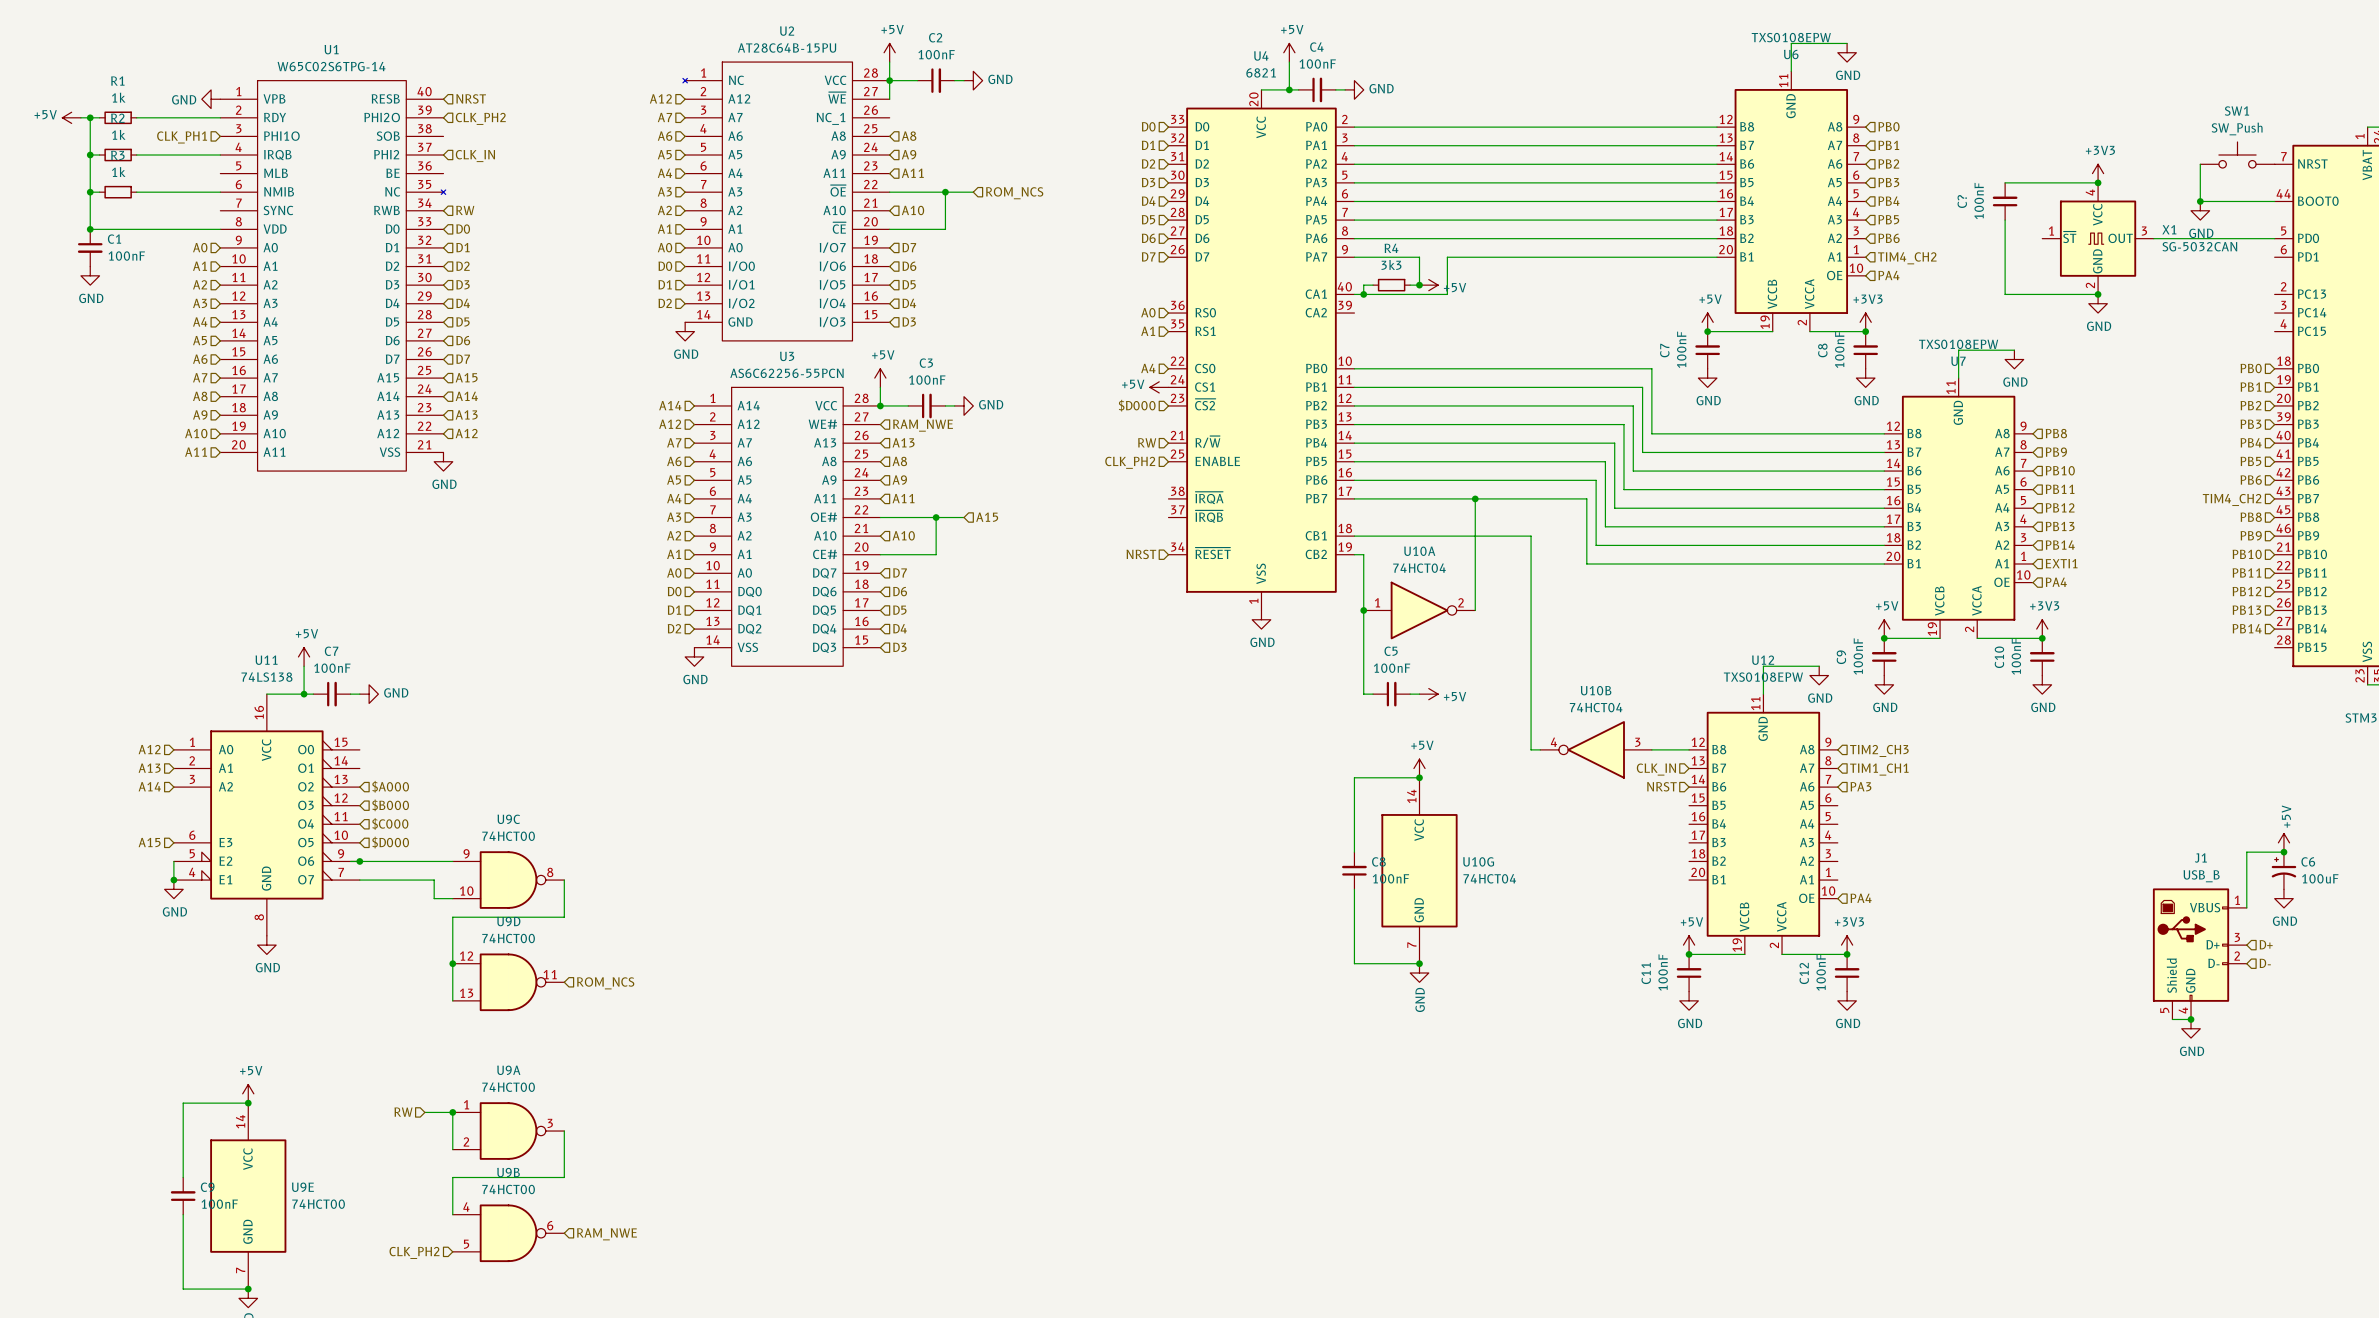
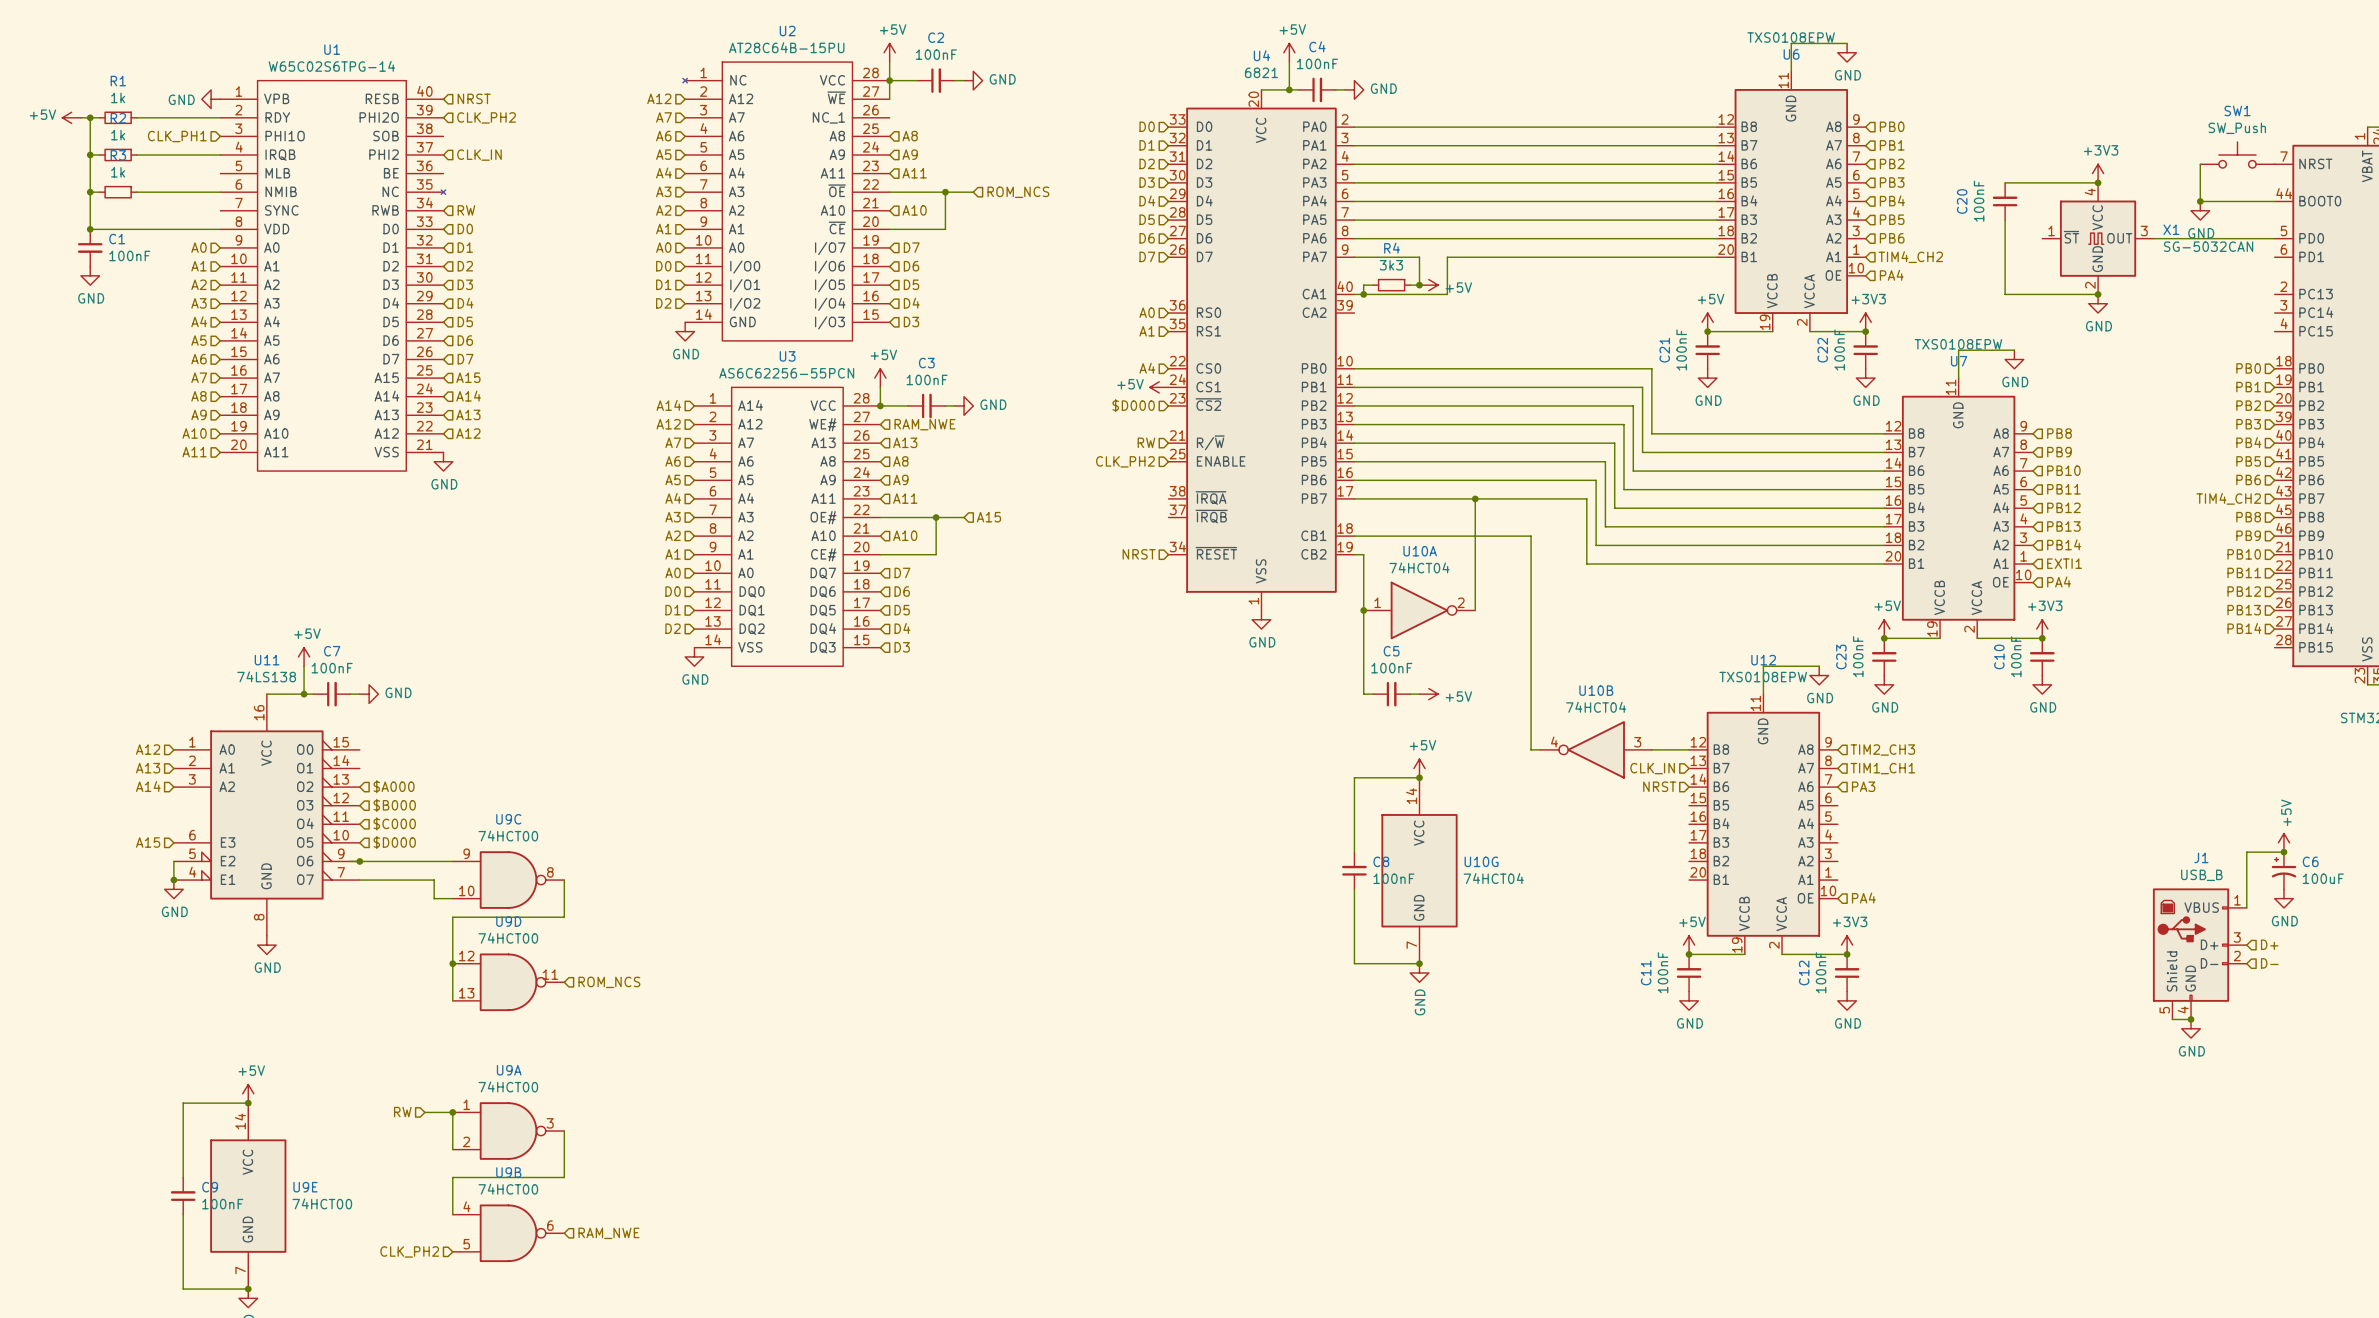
C? name: C? (1962, 201) -> C20 (1962, 201)
C7 name: C7 (1664, 350) -> C21 (1664, 350)
C8 name: C8 (1822, 350) -> C22 (1822, 350)
C9 name: C9 (1841, 657) -> C23 (1841, 656)

